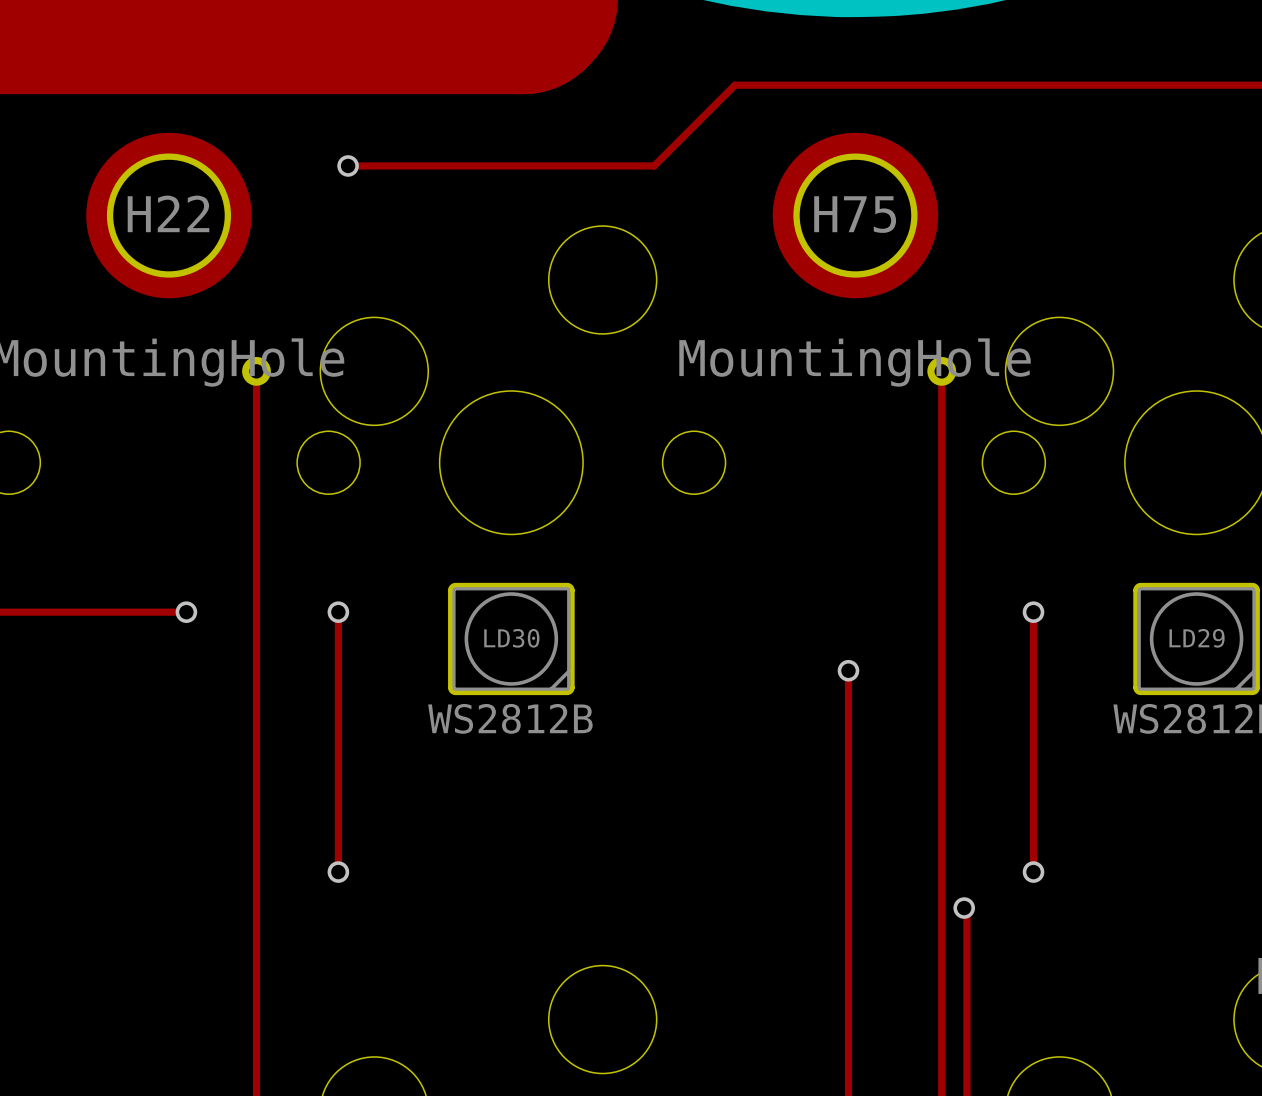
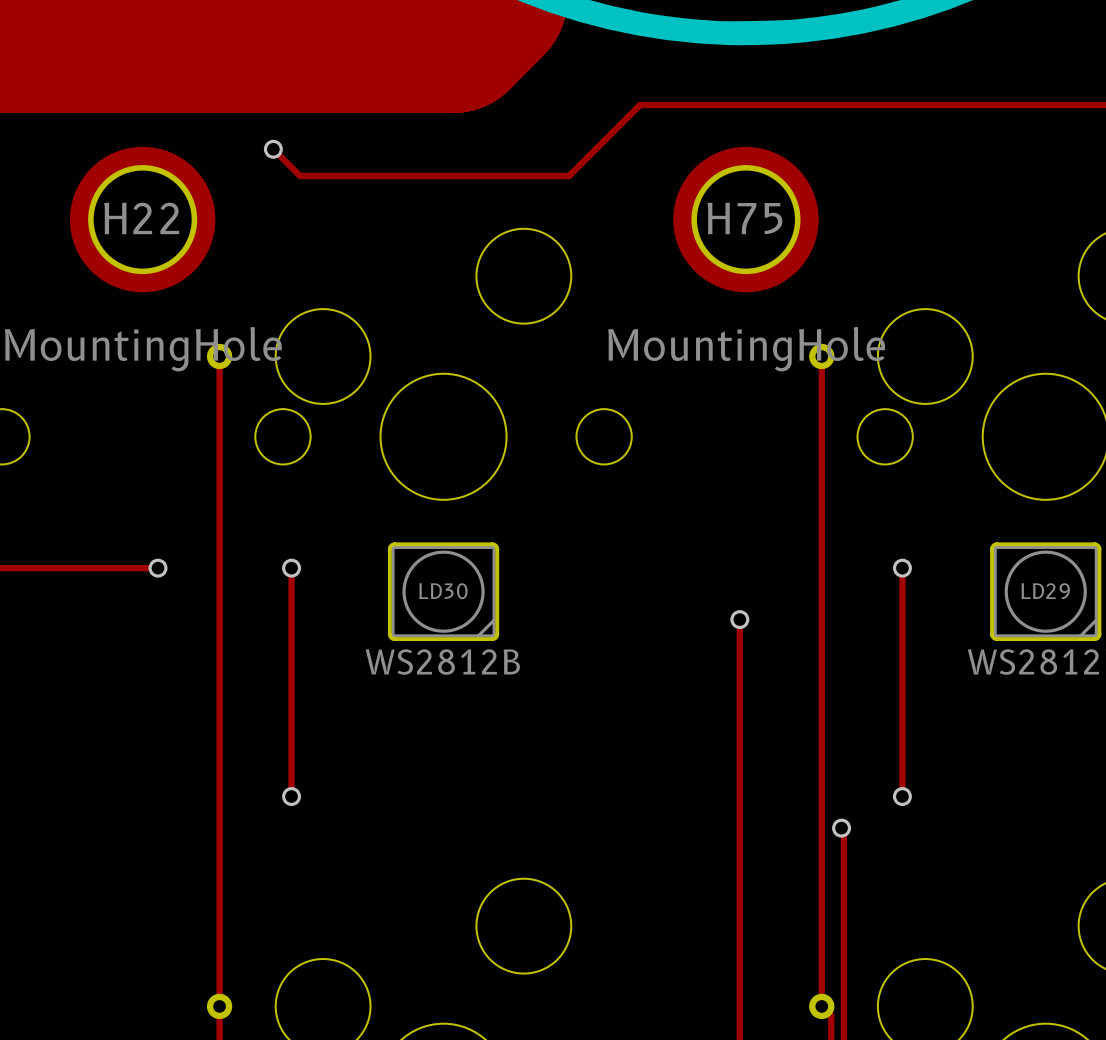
track: none -> (273, 149) (300, 176)
via position: (348, 165) -> (273, 149)

